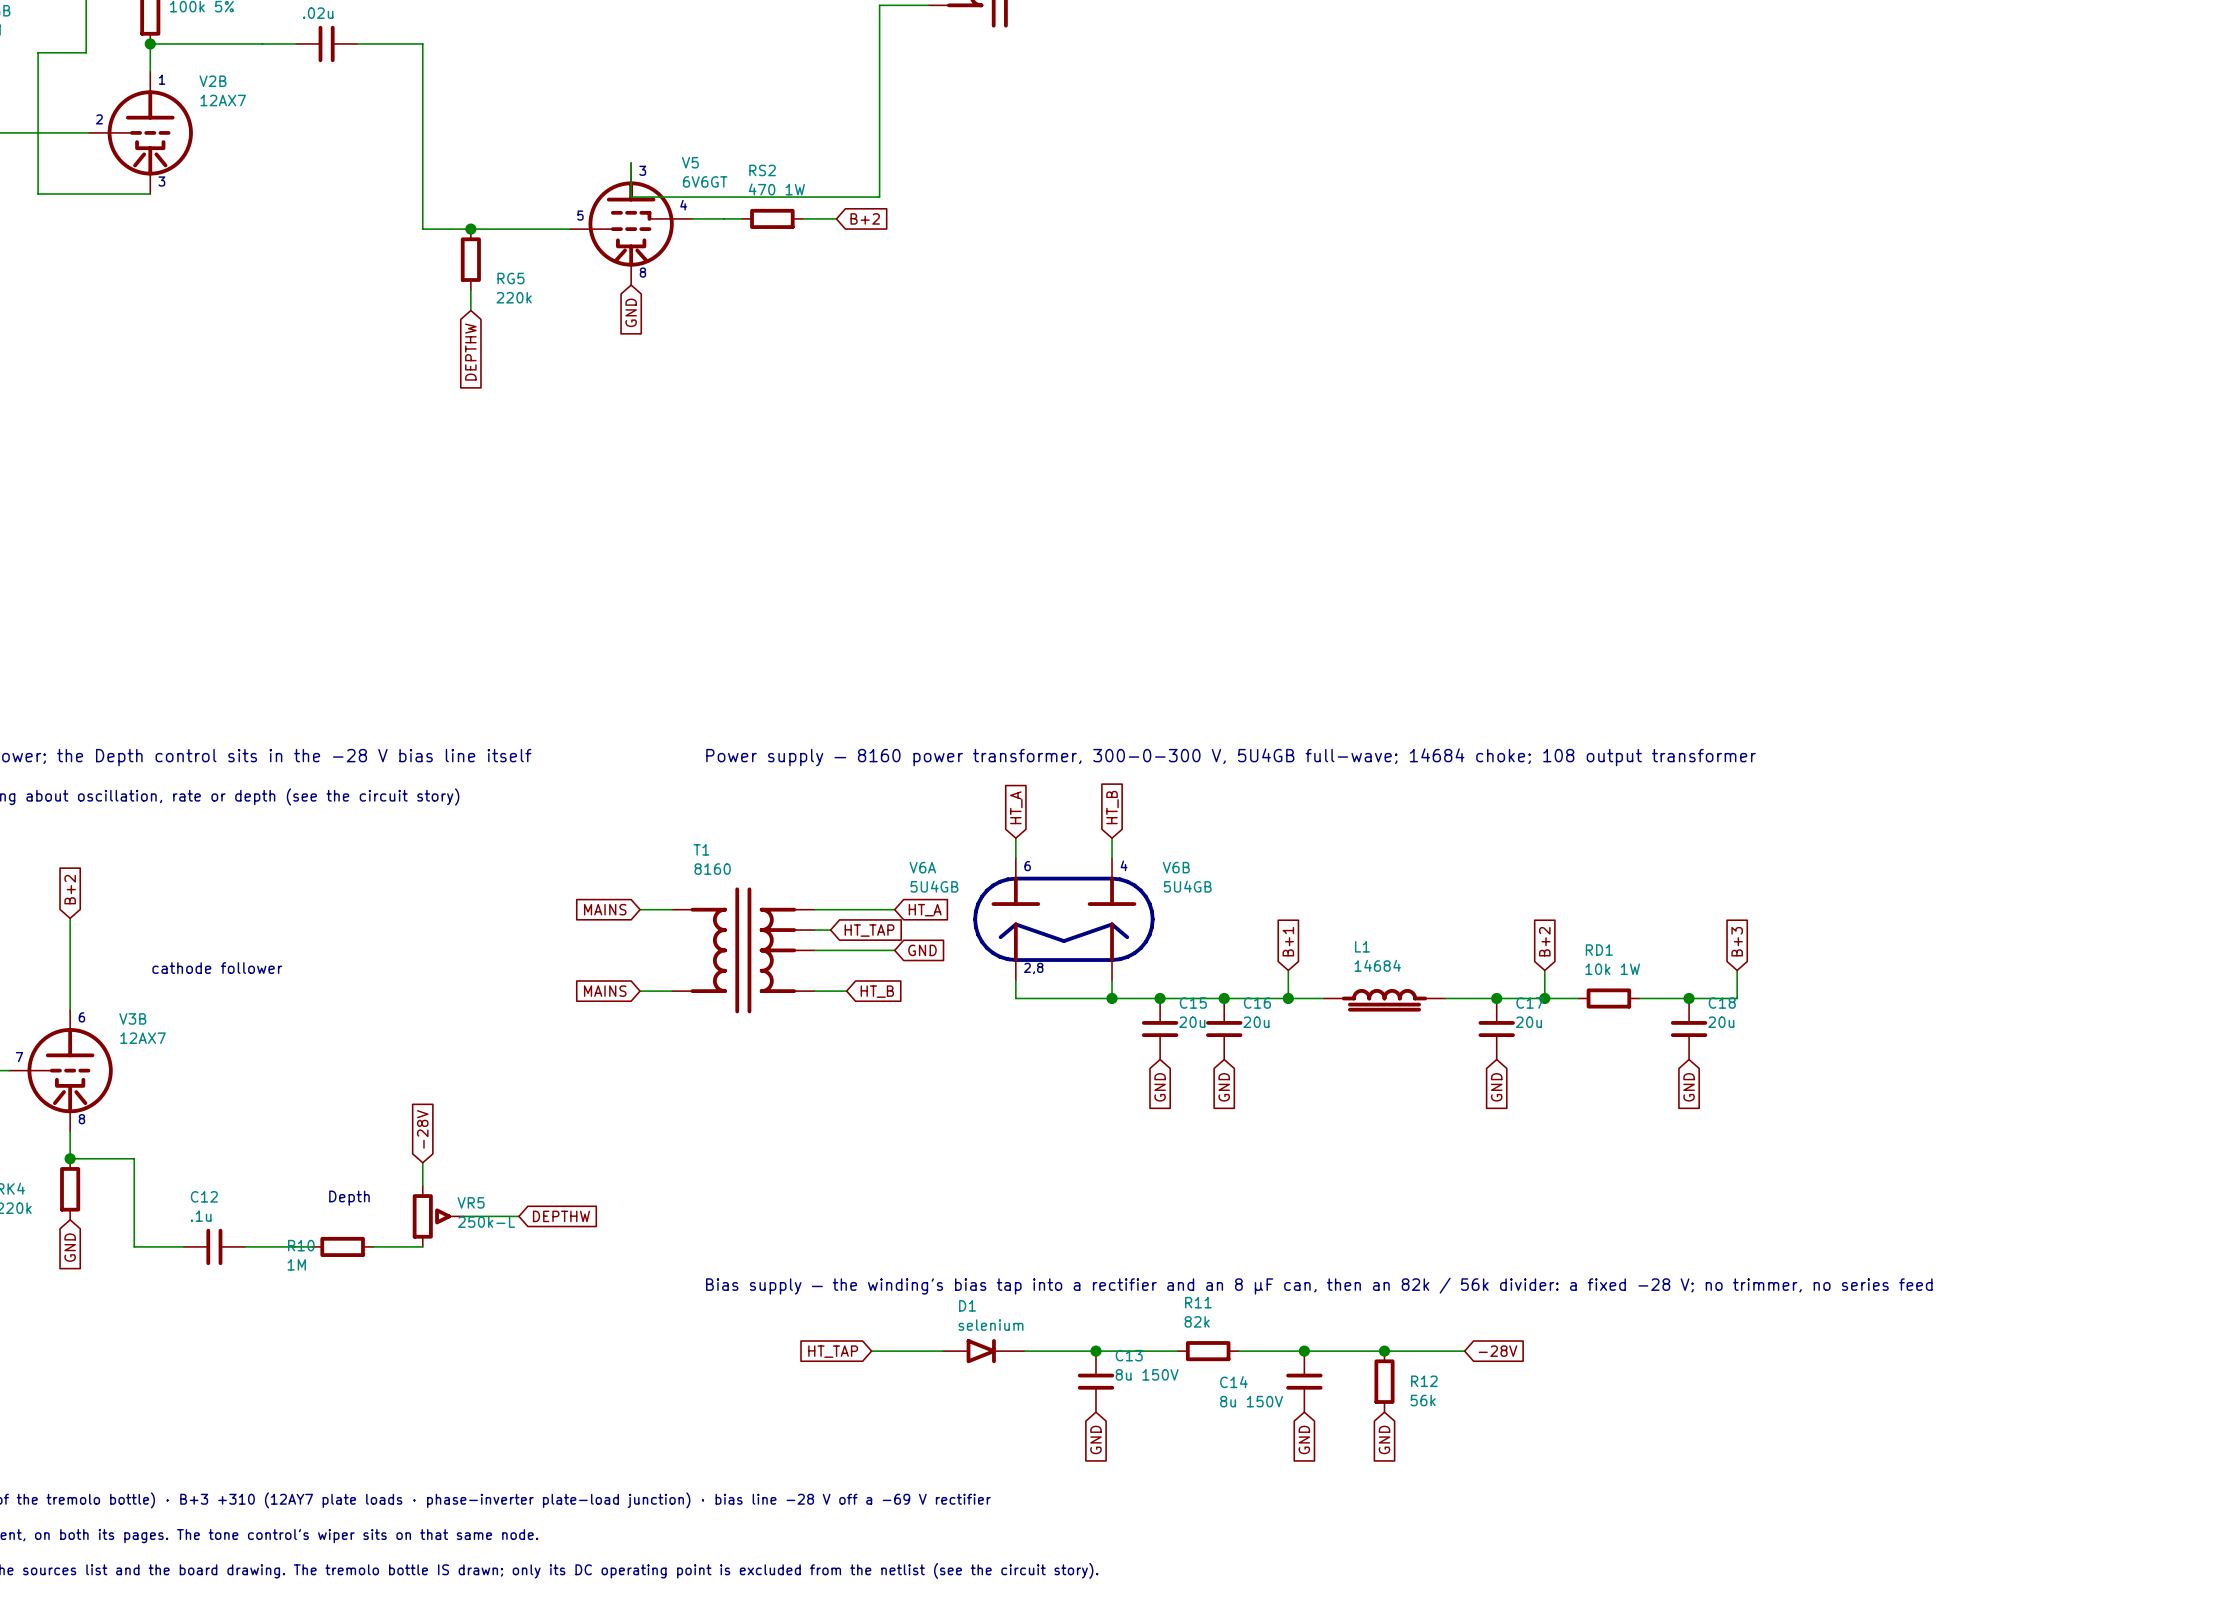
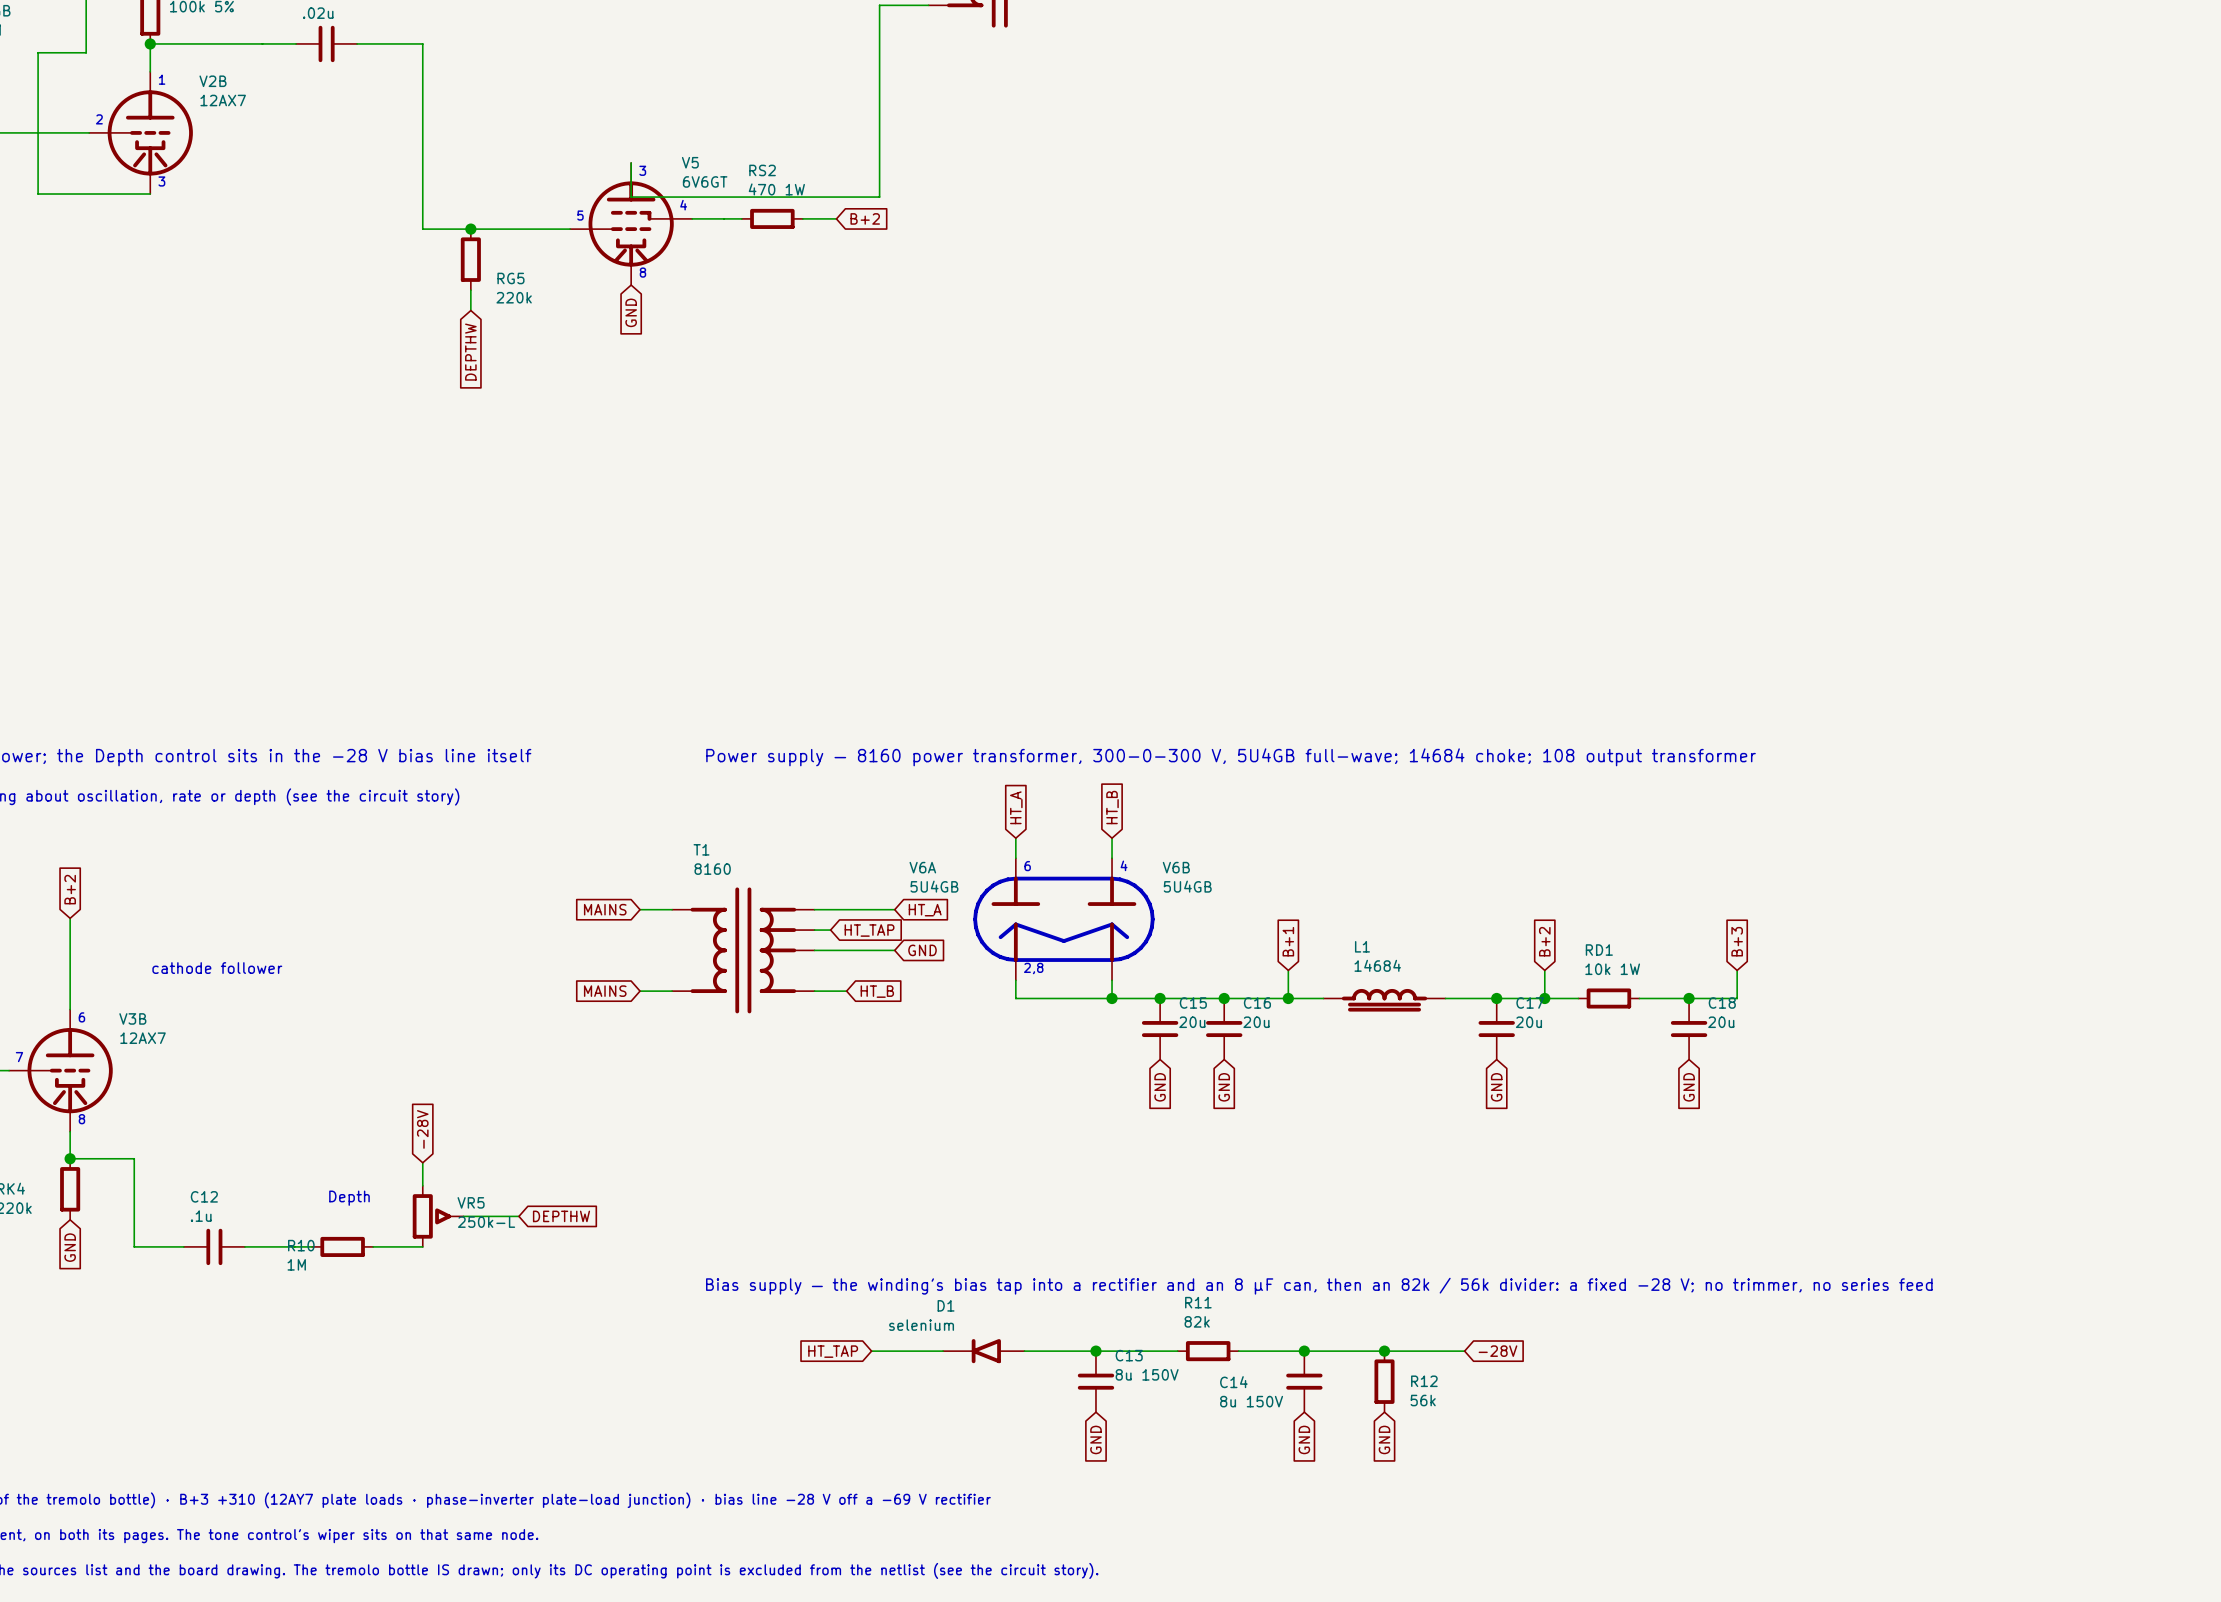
D1 name position: D1 (967, 1305) -> D1 (946, 1305)
D1 value position: selenium (991, 1325) -> selenium (921, 1325)
D1 rotation: 0° (981, 1351) -> 180° (986, 1351)

